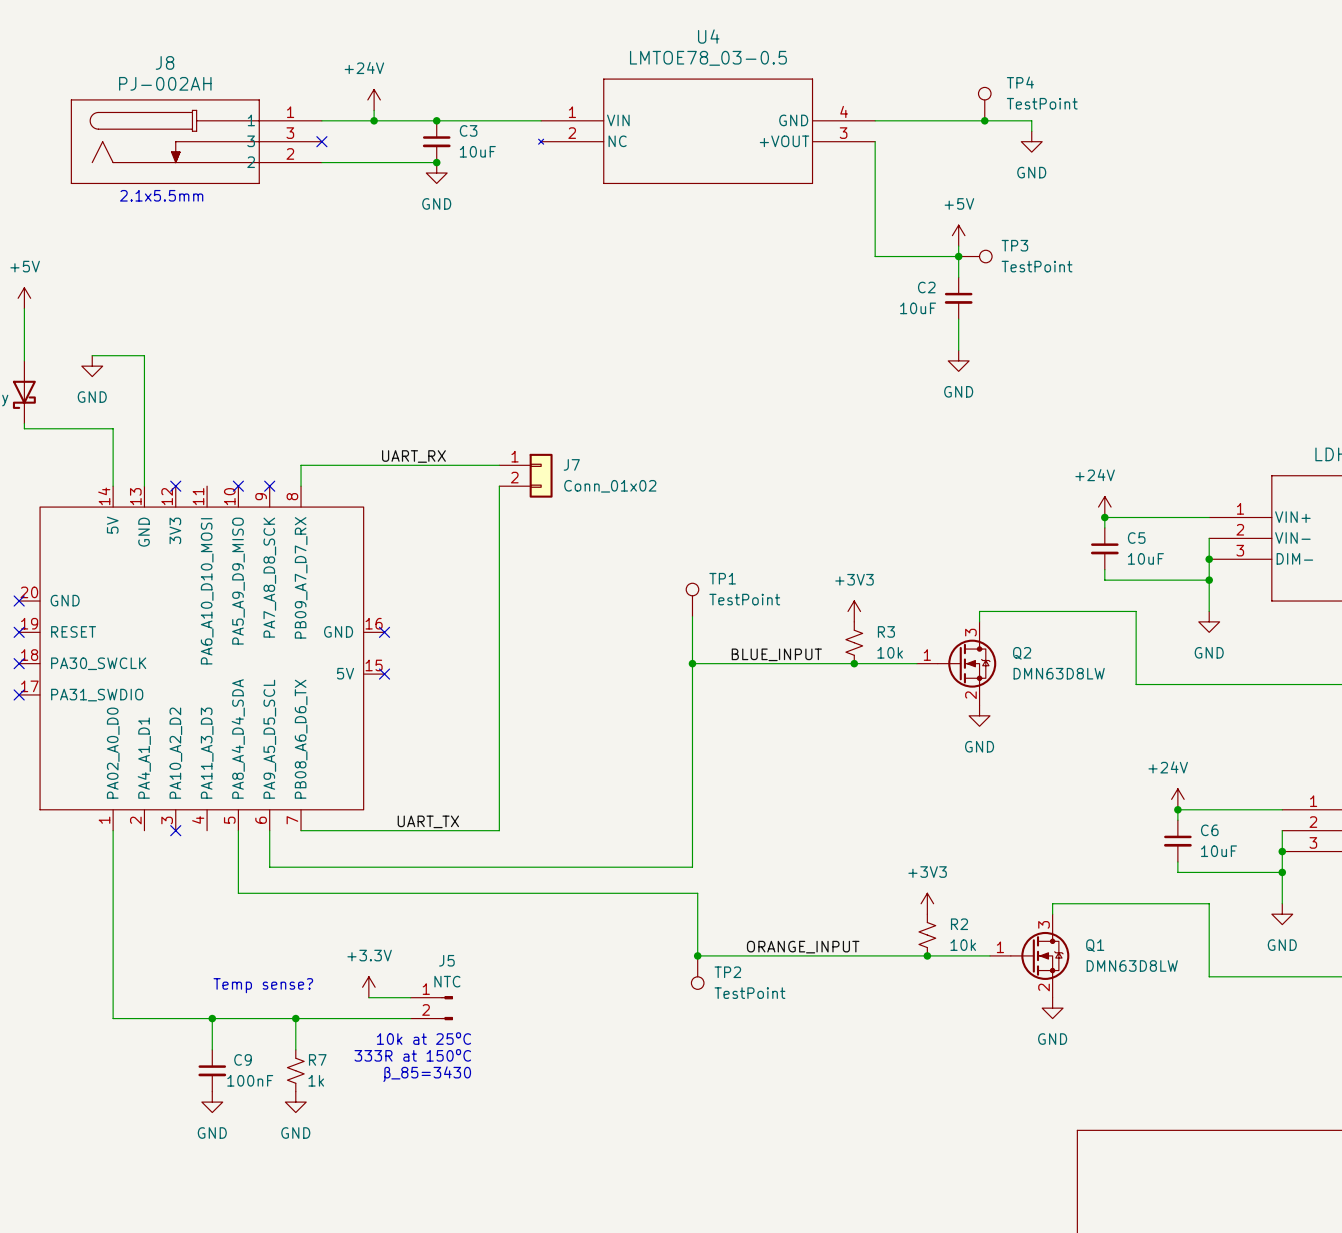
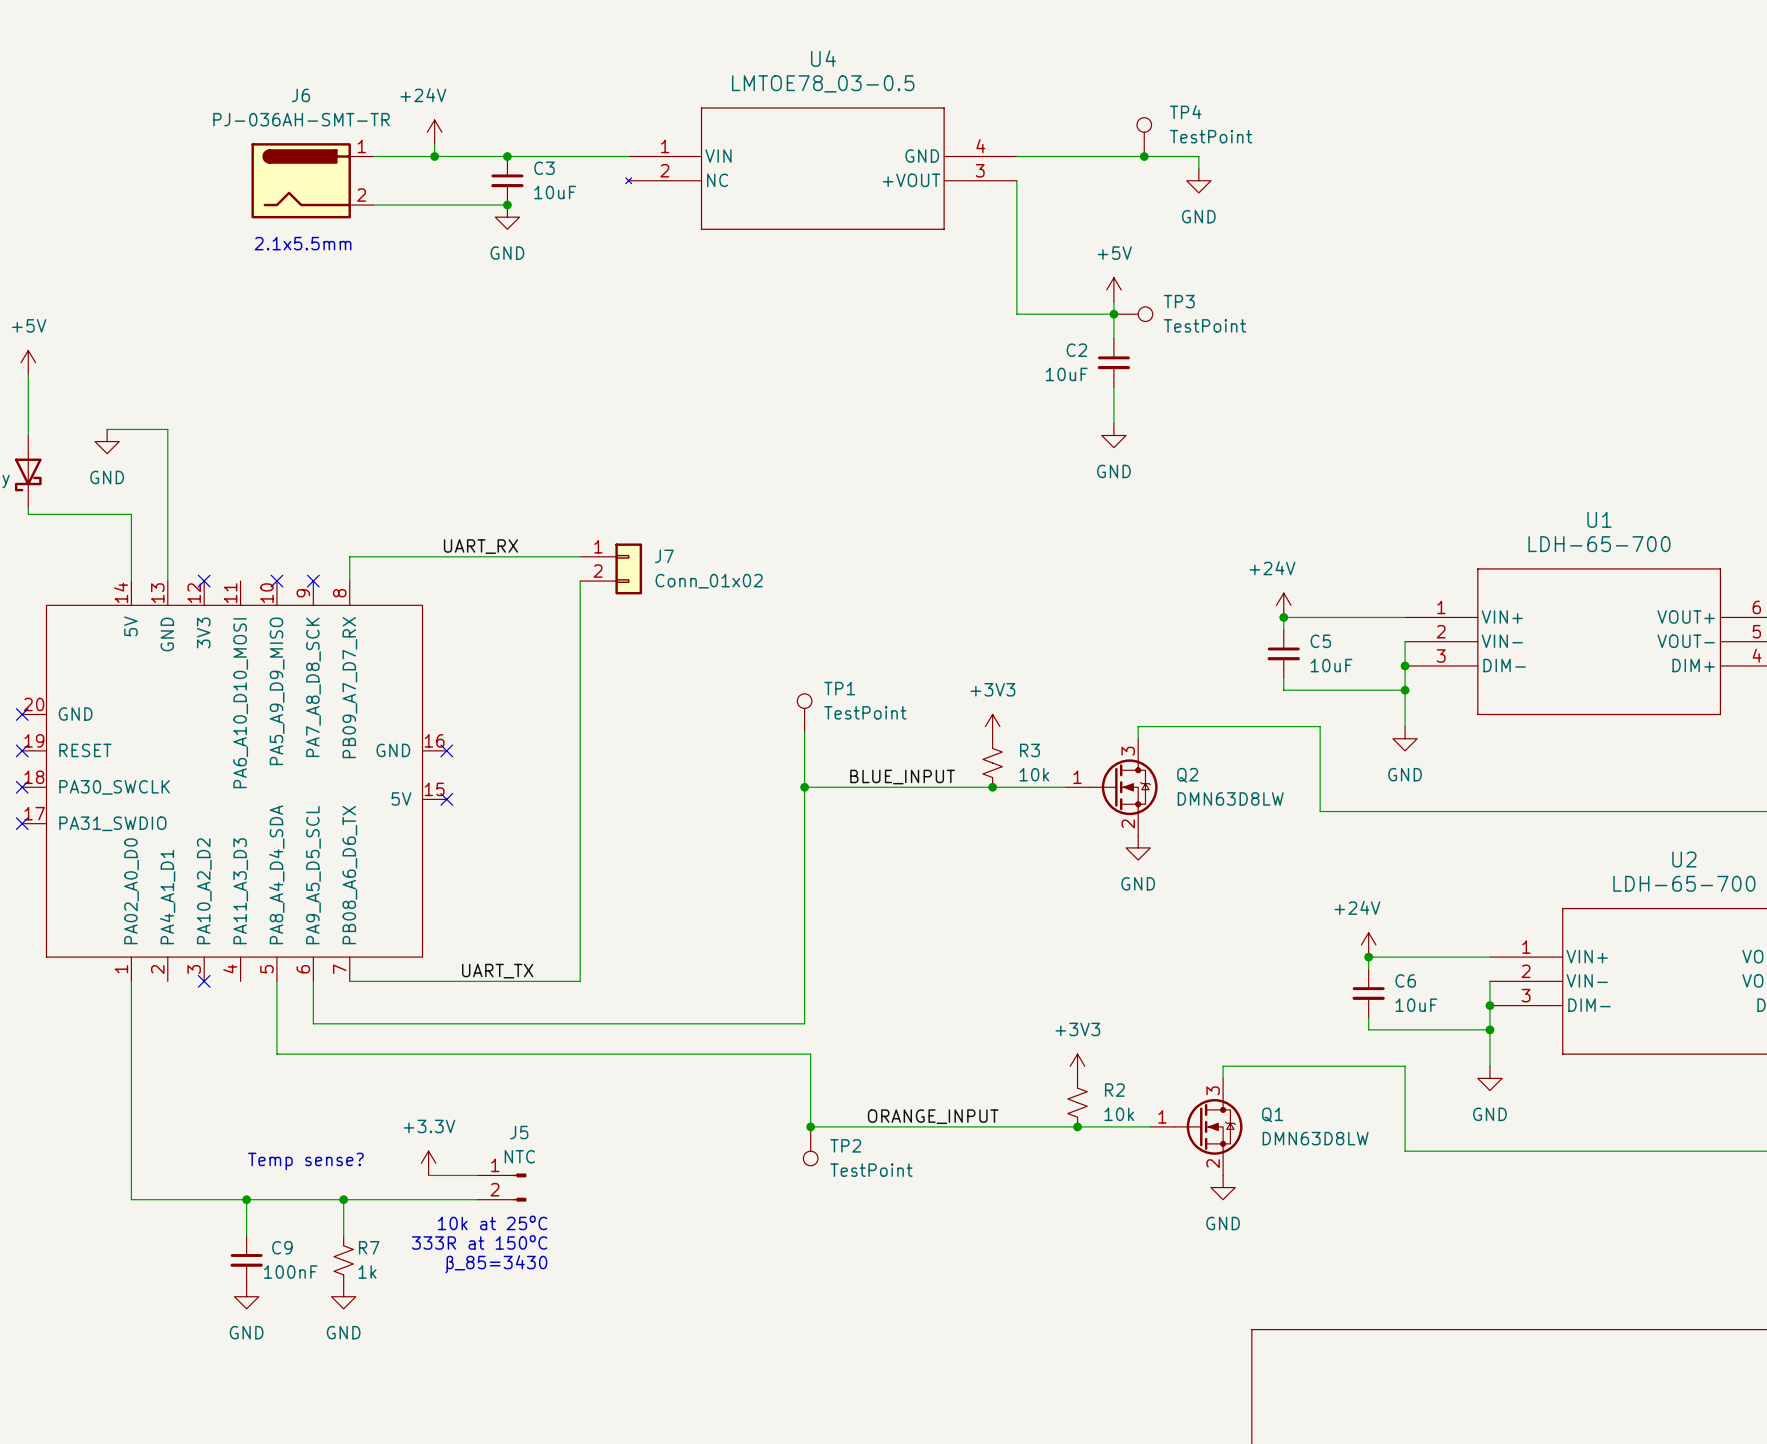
J8: PJ-002AH (196, 141) -> none
J6: none -> PJ-036AH-SMT-TR (312, 180)
no-connect mark: (321, 141) -> none
text position: 2.1x5.5mm (161, 195) -> 2.1x5.5mm (303, 243)

